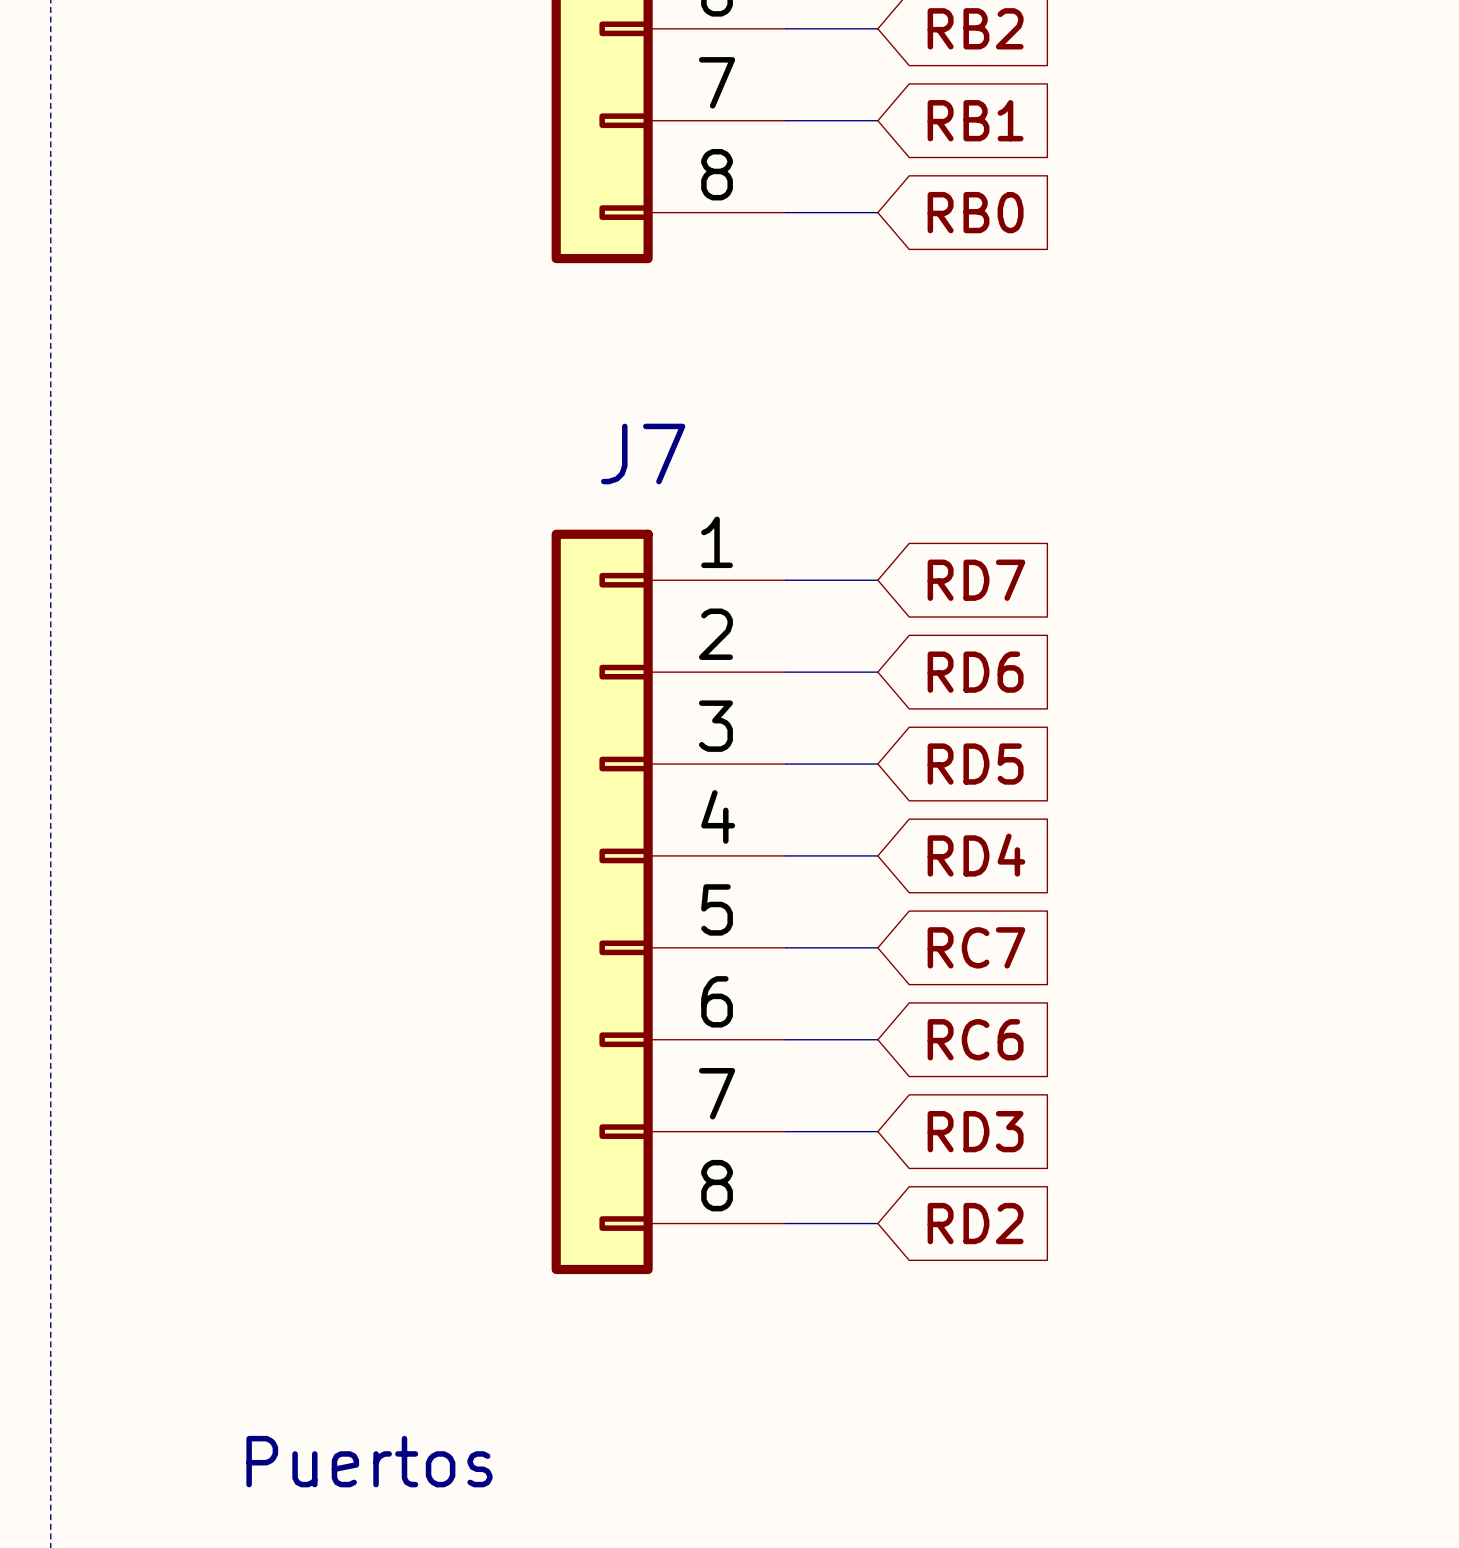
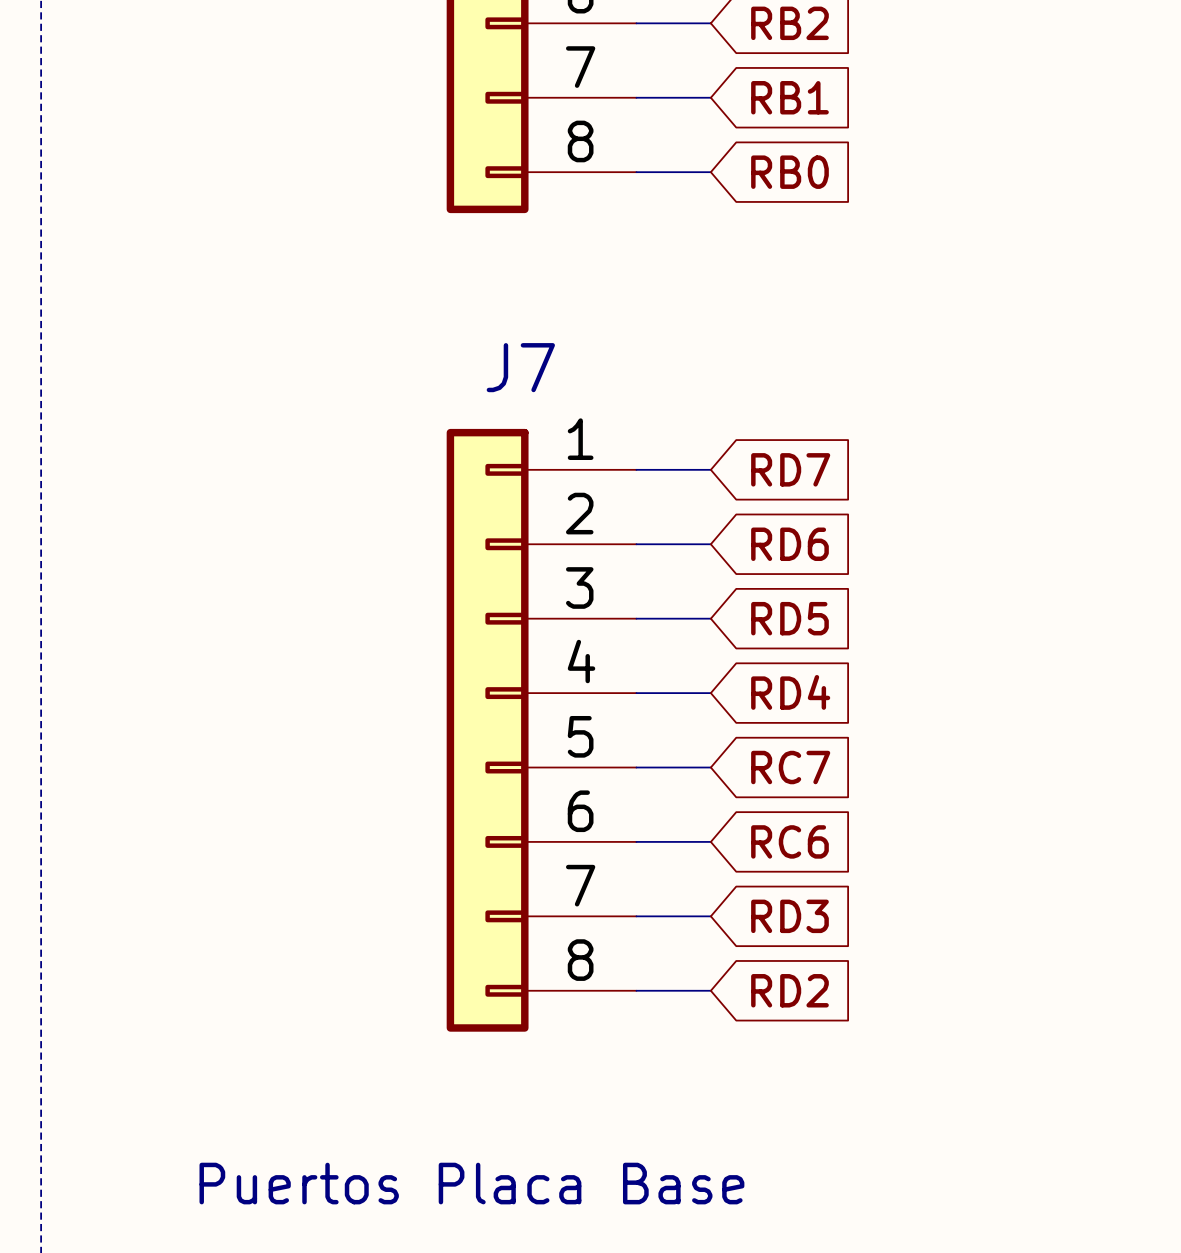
text: Puertos (369, 1461) -> Puertos Placa Base (471, 1183)

